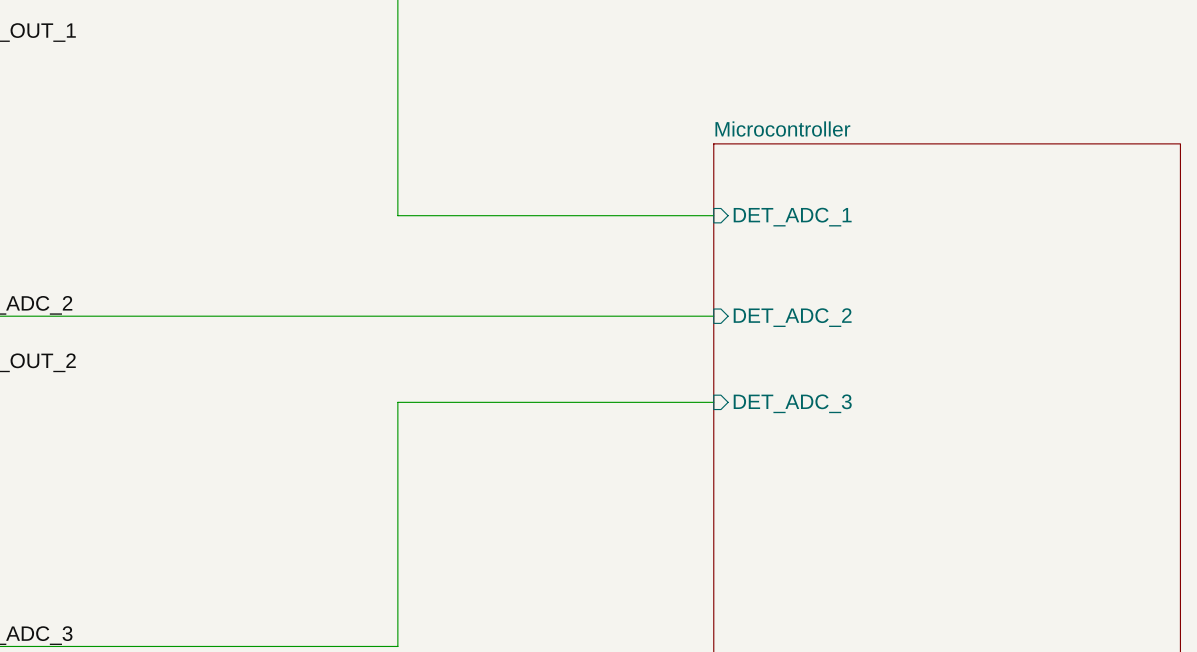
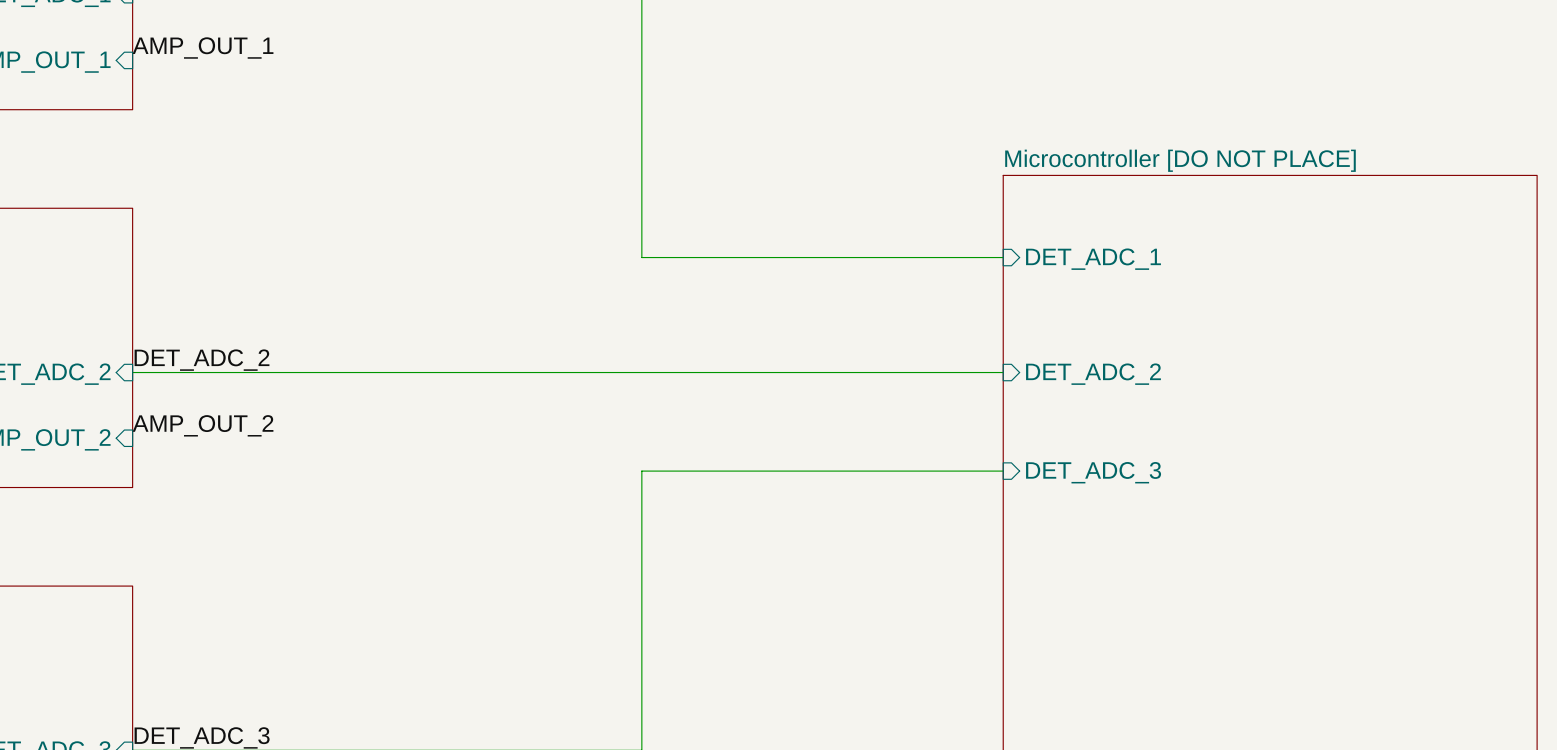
sheet Microcontroller name: Microcontroller (782, 129) -> Microcontroller [DO NOT PLACE] (1180, 160)

